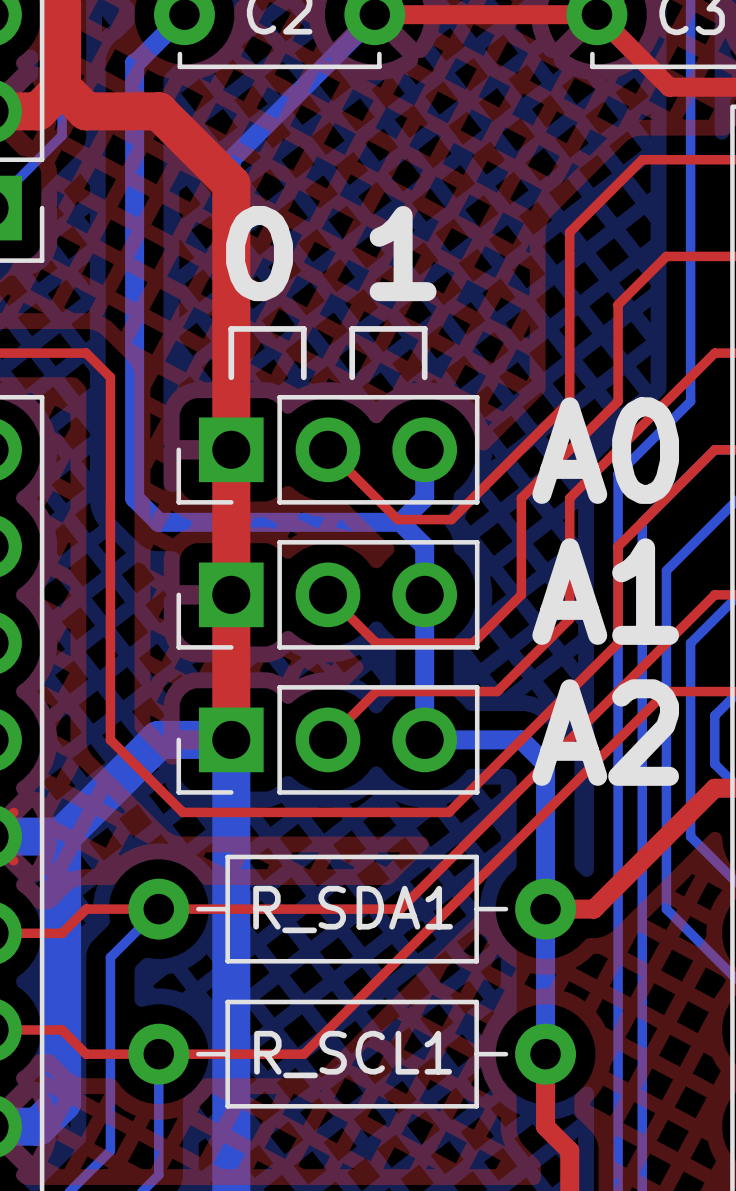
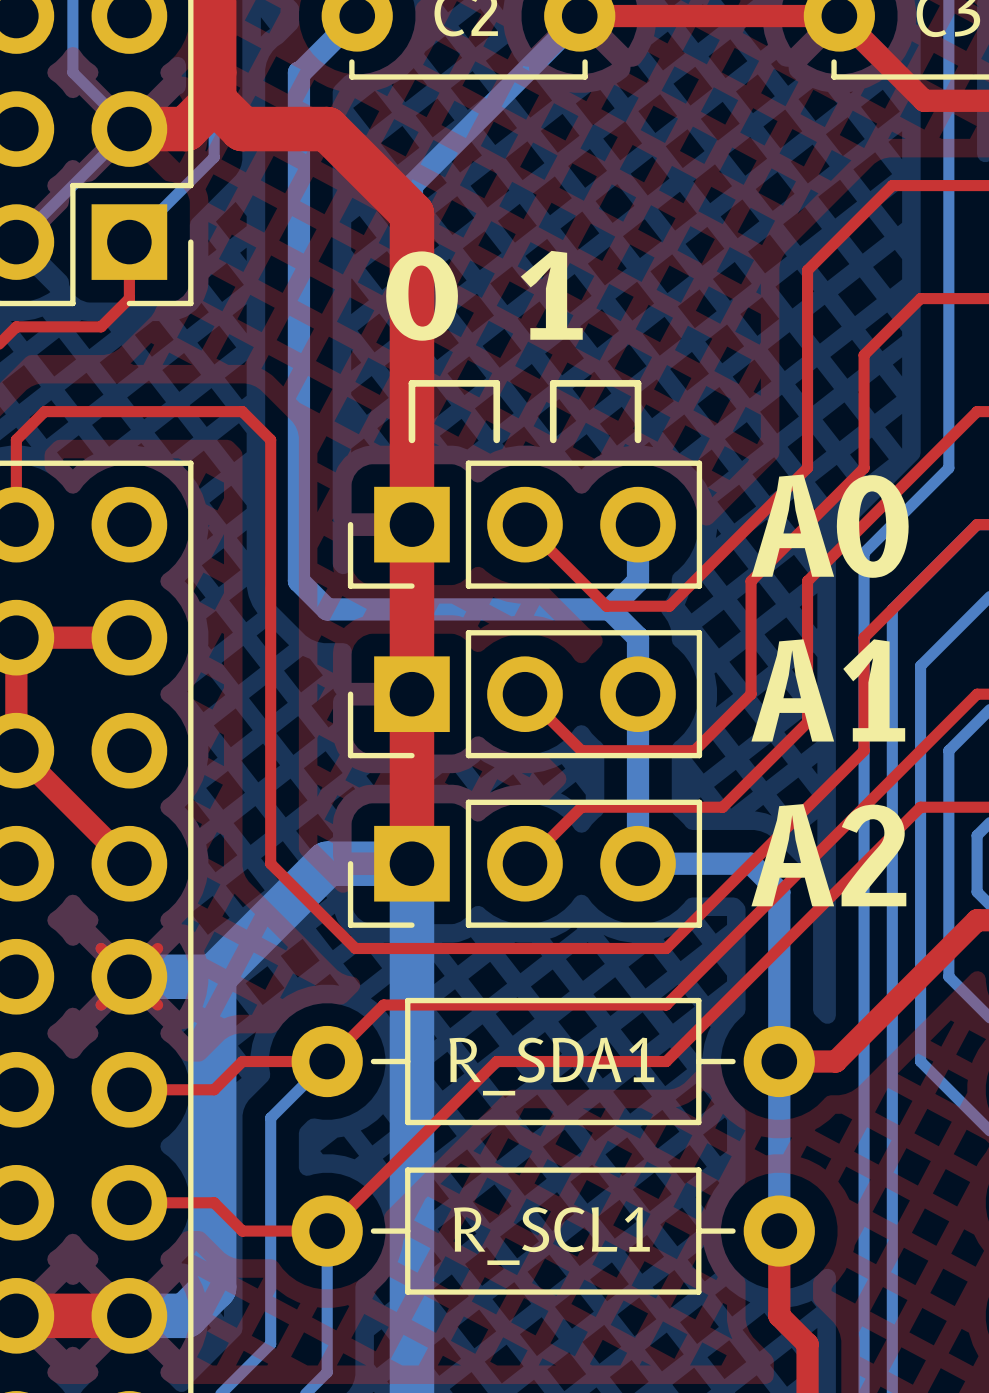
top track: (448, 860) (400, 909) -> (666, 1061) (609, 1061)
top track: none -> (666, 1005) (383, 1005) (327, 1061)
top track: (158, 909) (303, 909) -> (327, 1231) (496, 1061)
top track: (448, 909) (303, 1054) (158, 1054) -> none

